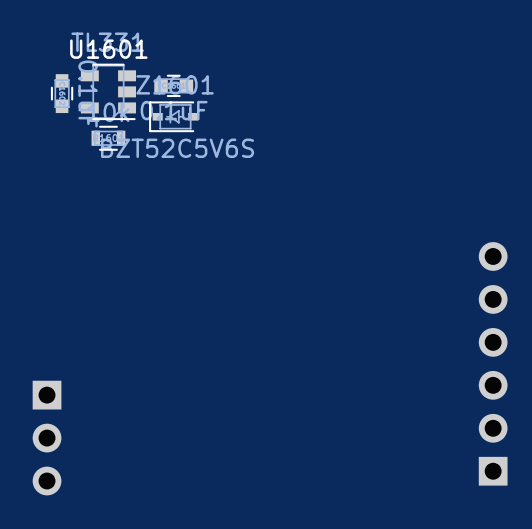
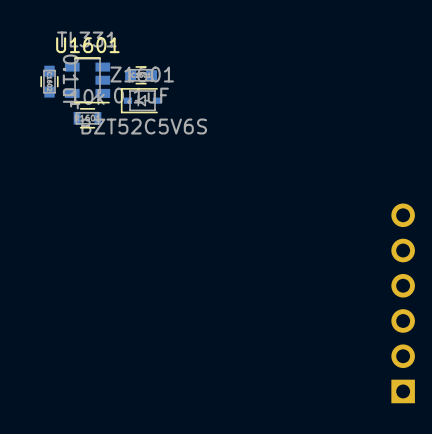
part: (47, 438) -> none

